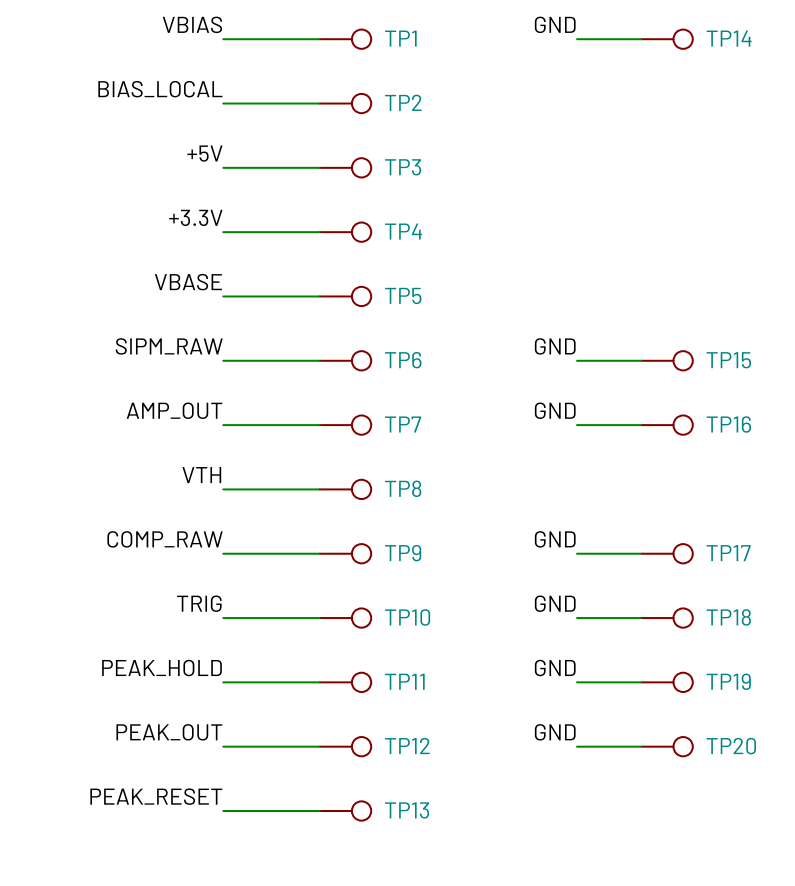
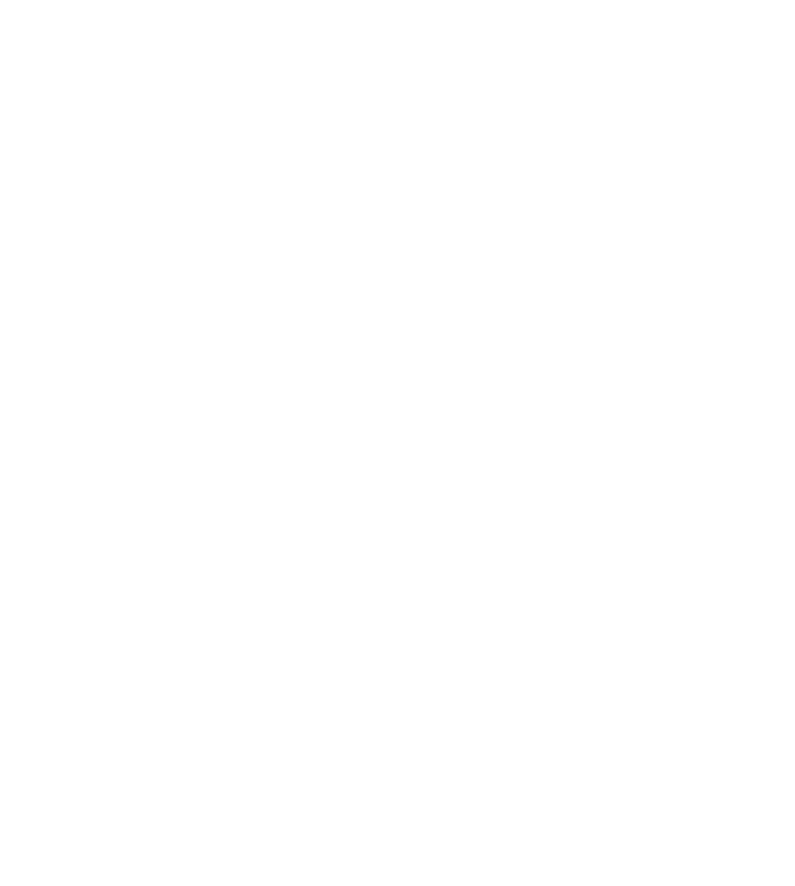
label: VBIAS (192, 24) -> none
label: GND (555, 24) -> none
wire: (223, 39) (319, 39) -> none
TP1: (345, 39) -> none
wire: (577, 39) (641, 39) -> none
TP14: (667, 39) -> none
label: BIAS_LOCAL (160, 89) -> none
wire: (223, 103) (319, 103) -> none
TP2: (345, 103) -> none
label: +5V (204, 153) -> none
wire: (223, 167) (319, 167) -> none
TP3: (345, 167) -> none
label: +3.3V (195, 217) -> none
wire: (223, 232) (319, 232) -> none
TP4: (345, 232) -> none
label: VBASE (188, 282) -> none
wire: (223, 296) (319, 296) -> none
TP5: (345, 296) -> none
label: SIPM_RAW (169, 346) -> none
label: GND (555, 346) -> none
wire: (223, 360) (319, 360) -> none
TP6: (345, 360) -> none
wire: (577, 360) (641, 360) -> none
TP15: (667, 360) -> none
label: AMP_OUT (174, 410) -> none
label: GND (555, 410) -> none
wire: (223, 425) (319, 425) -> none
TP7: (345, 425) -> none
wire: (577, 425) (641, 425) -> none
TP16: (667, 425) -> none
label: VTH (201, 475) -> none
wire: (223, 489) (319, 489) -> none
TP8: (345, 489) -> none
label: COMP_RAW (165, 539) -> none
label: GND (555, 539) -> none
wire: (223, 553) (319, 553) -> none
TP9: (345, 553) -> none
wire: (577, 553) (641, 553) -> none
TP17: (667, 553) -> none
label: TRIG (199, 603) -> none
label: GND (555, 603) -> none
wire: (223, 618) (319, 618) -> none
TP10: (345, 618) -> none
wire: (577, 618) (641, 618) -> none
TP18: (667, 618) -> none
label: PEAK_HOLD (161, 668) -> none
label: GND (555, 668) -> none
wire: (223, 682) (319, 682) -> none
TP11: (345, 682) -> none
wire: (577, 682) (641, 682) -> none
TP19: (667, 682) -> none
label: PEAK_OUT (169, 732) -> none
label: GND (555, 732) -> none
wire: (223, 746) (319, 746) -> none
TP12: (345, 746) -> none
wire: (577, 746) (641, 746) -> none
TP20: (667, 746) -> none
label: PEAK_RESET (156, 796) -> none
wire: (223, 810) (319, 810) -> none
TP13: (345, 810) -> none

